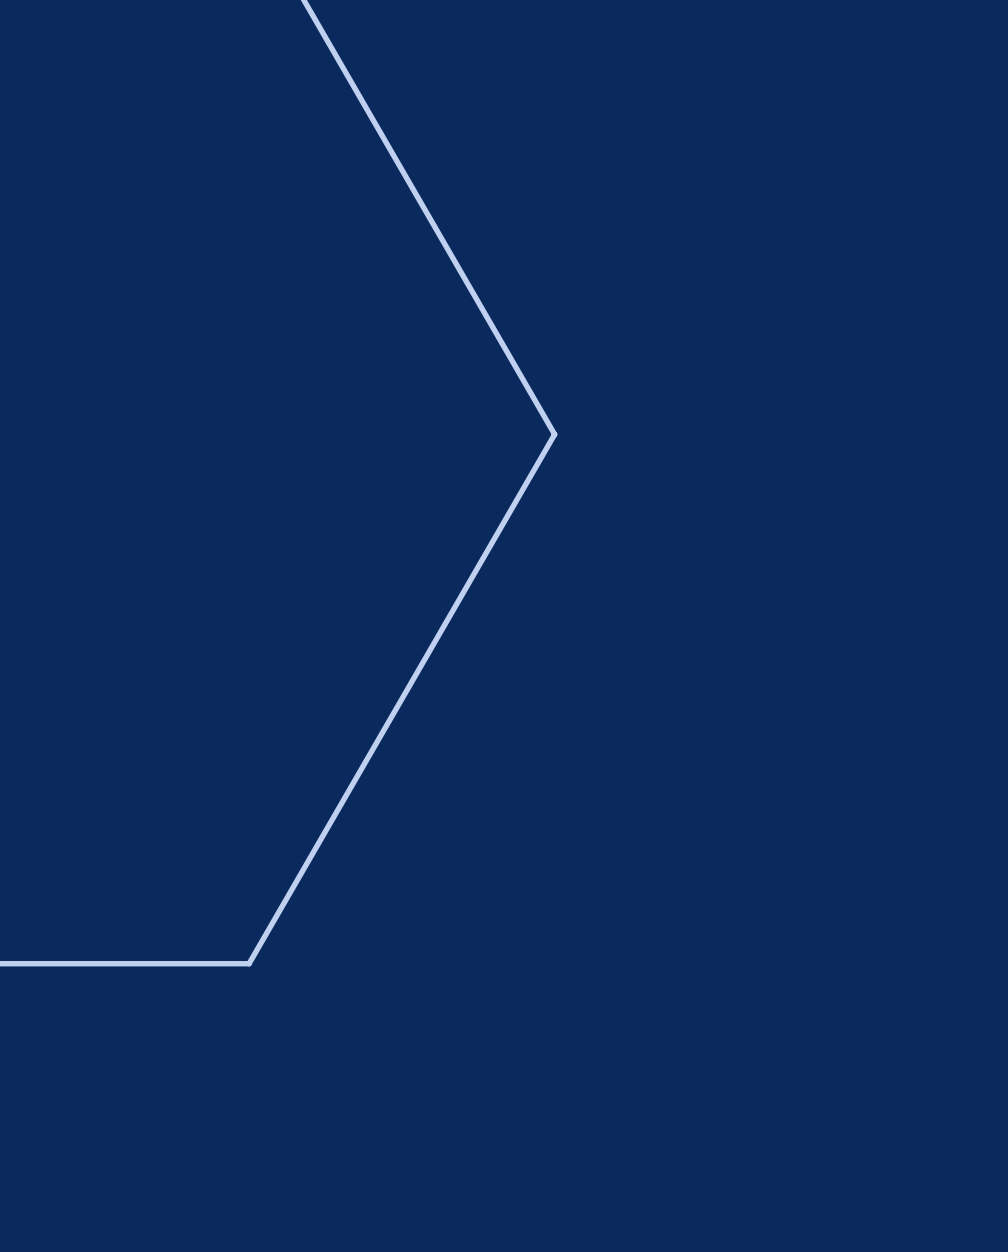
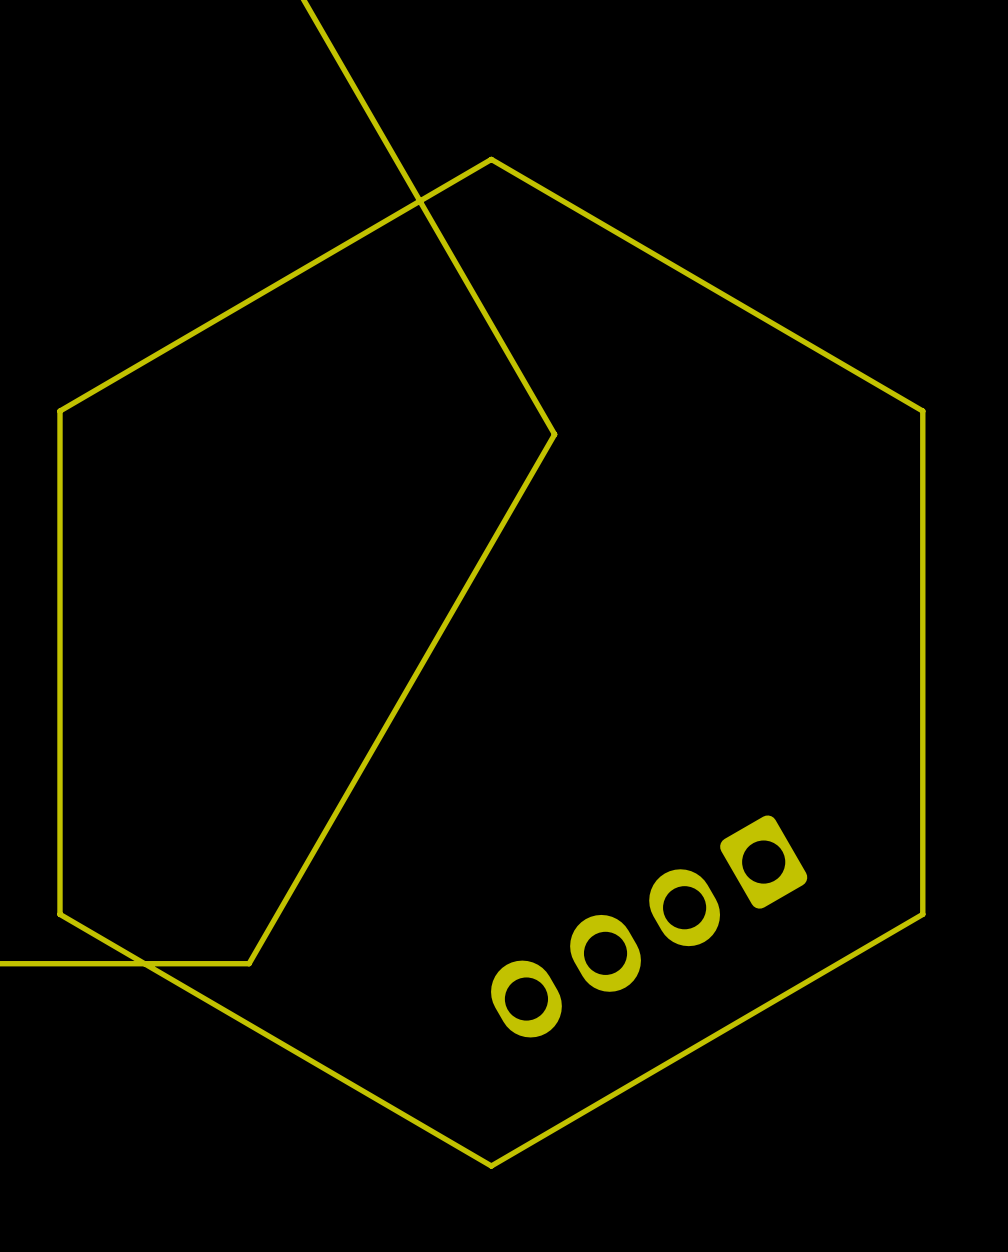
board edge: none -> (491, 159) (922, 411) (922, 914) (491, 1166) (59, 914) (59, 411) (491, 159)
part: none -> (649, 926)

